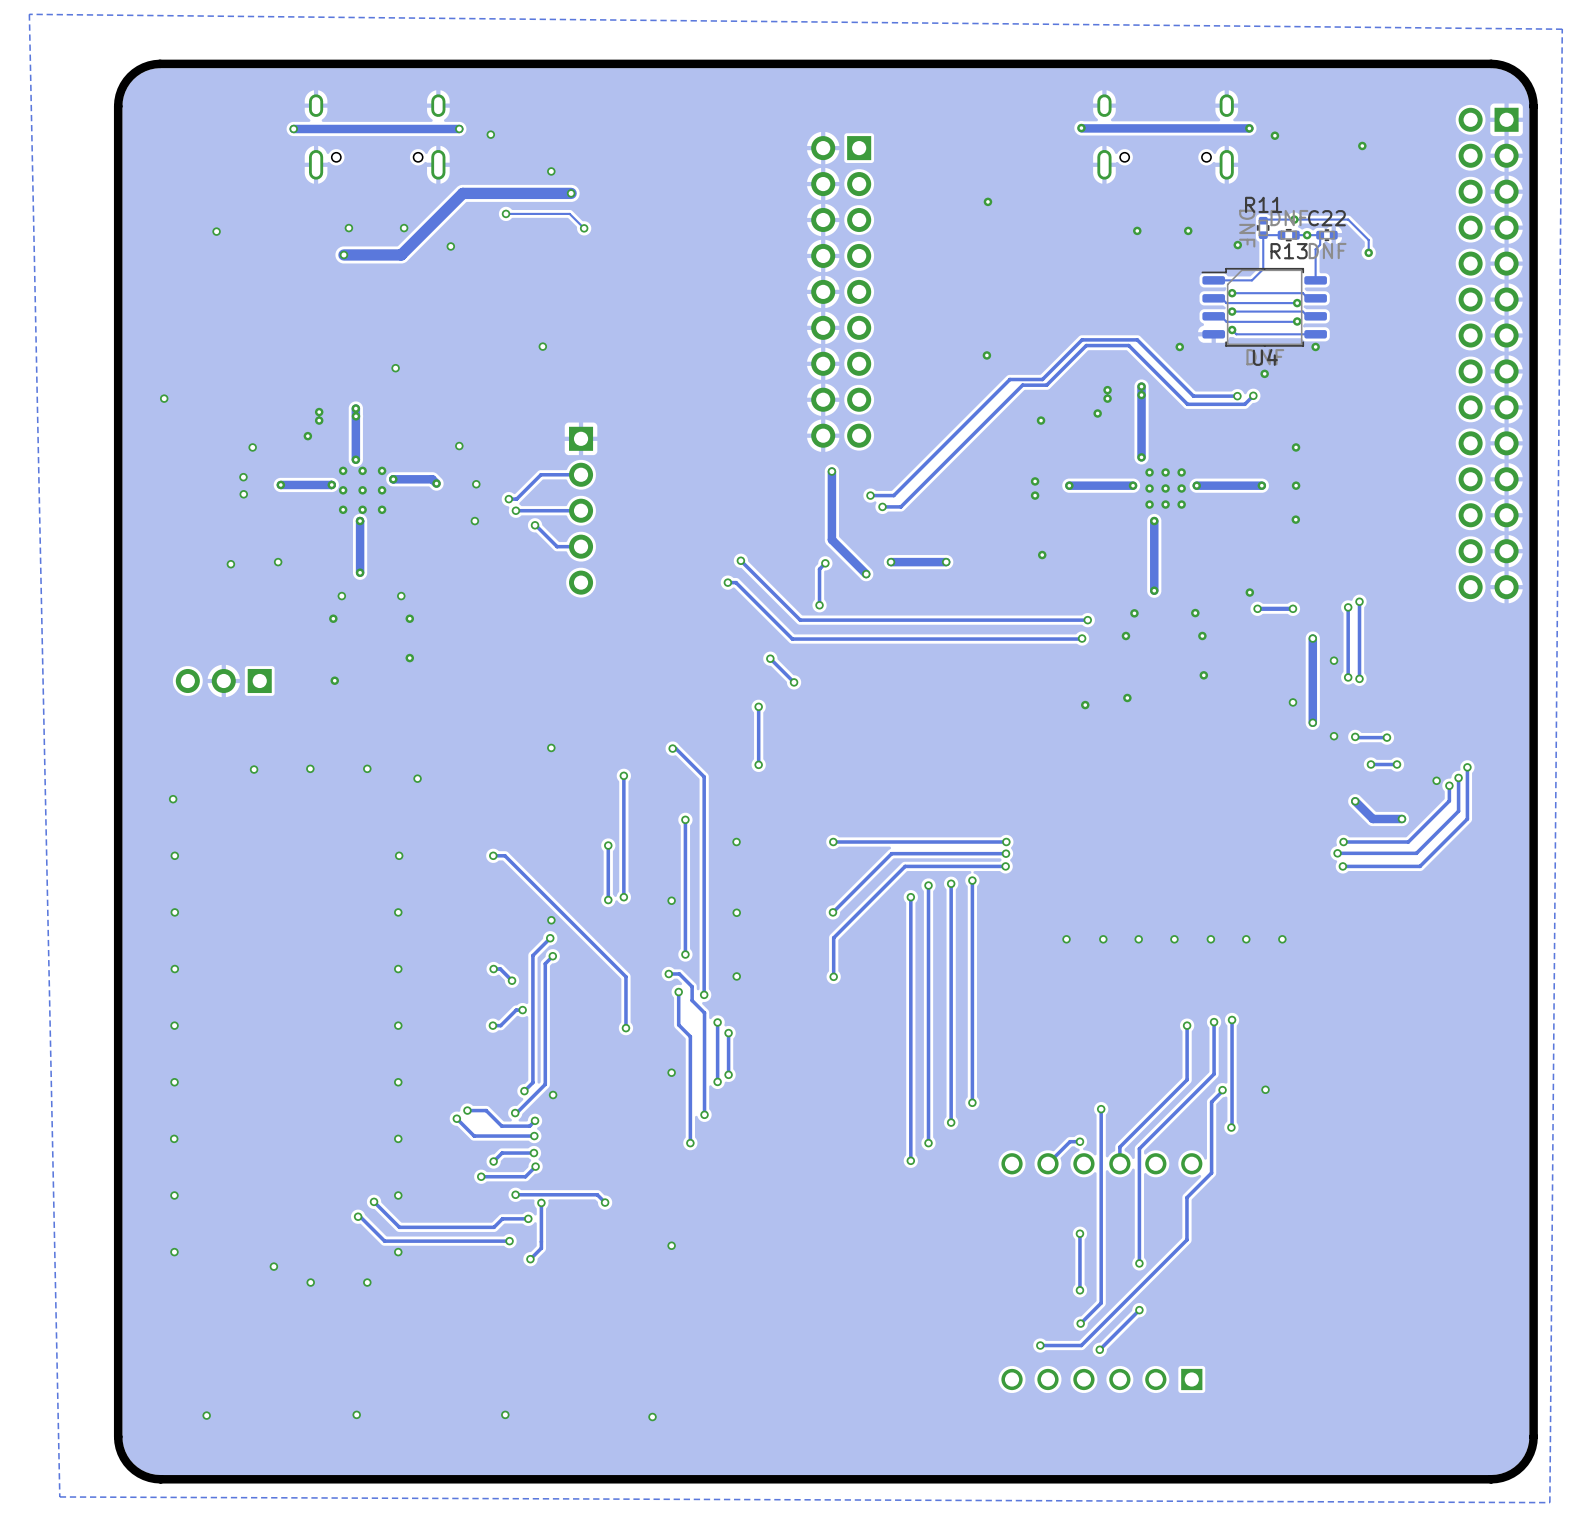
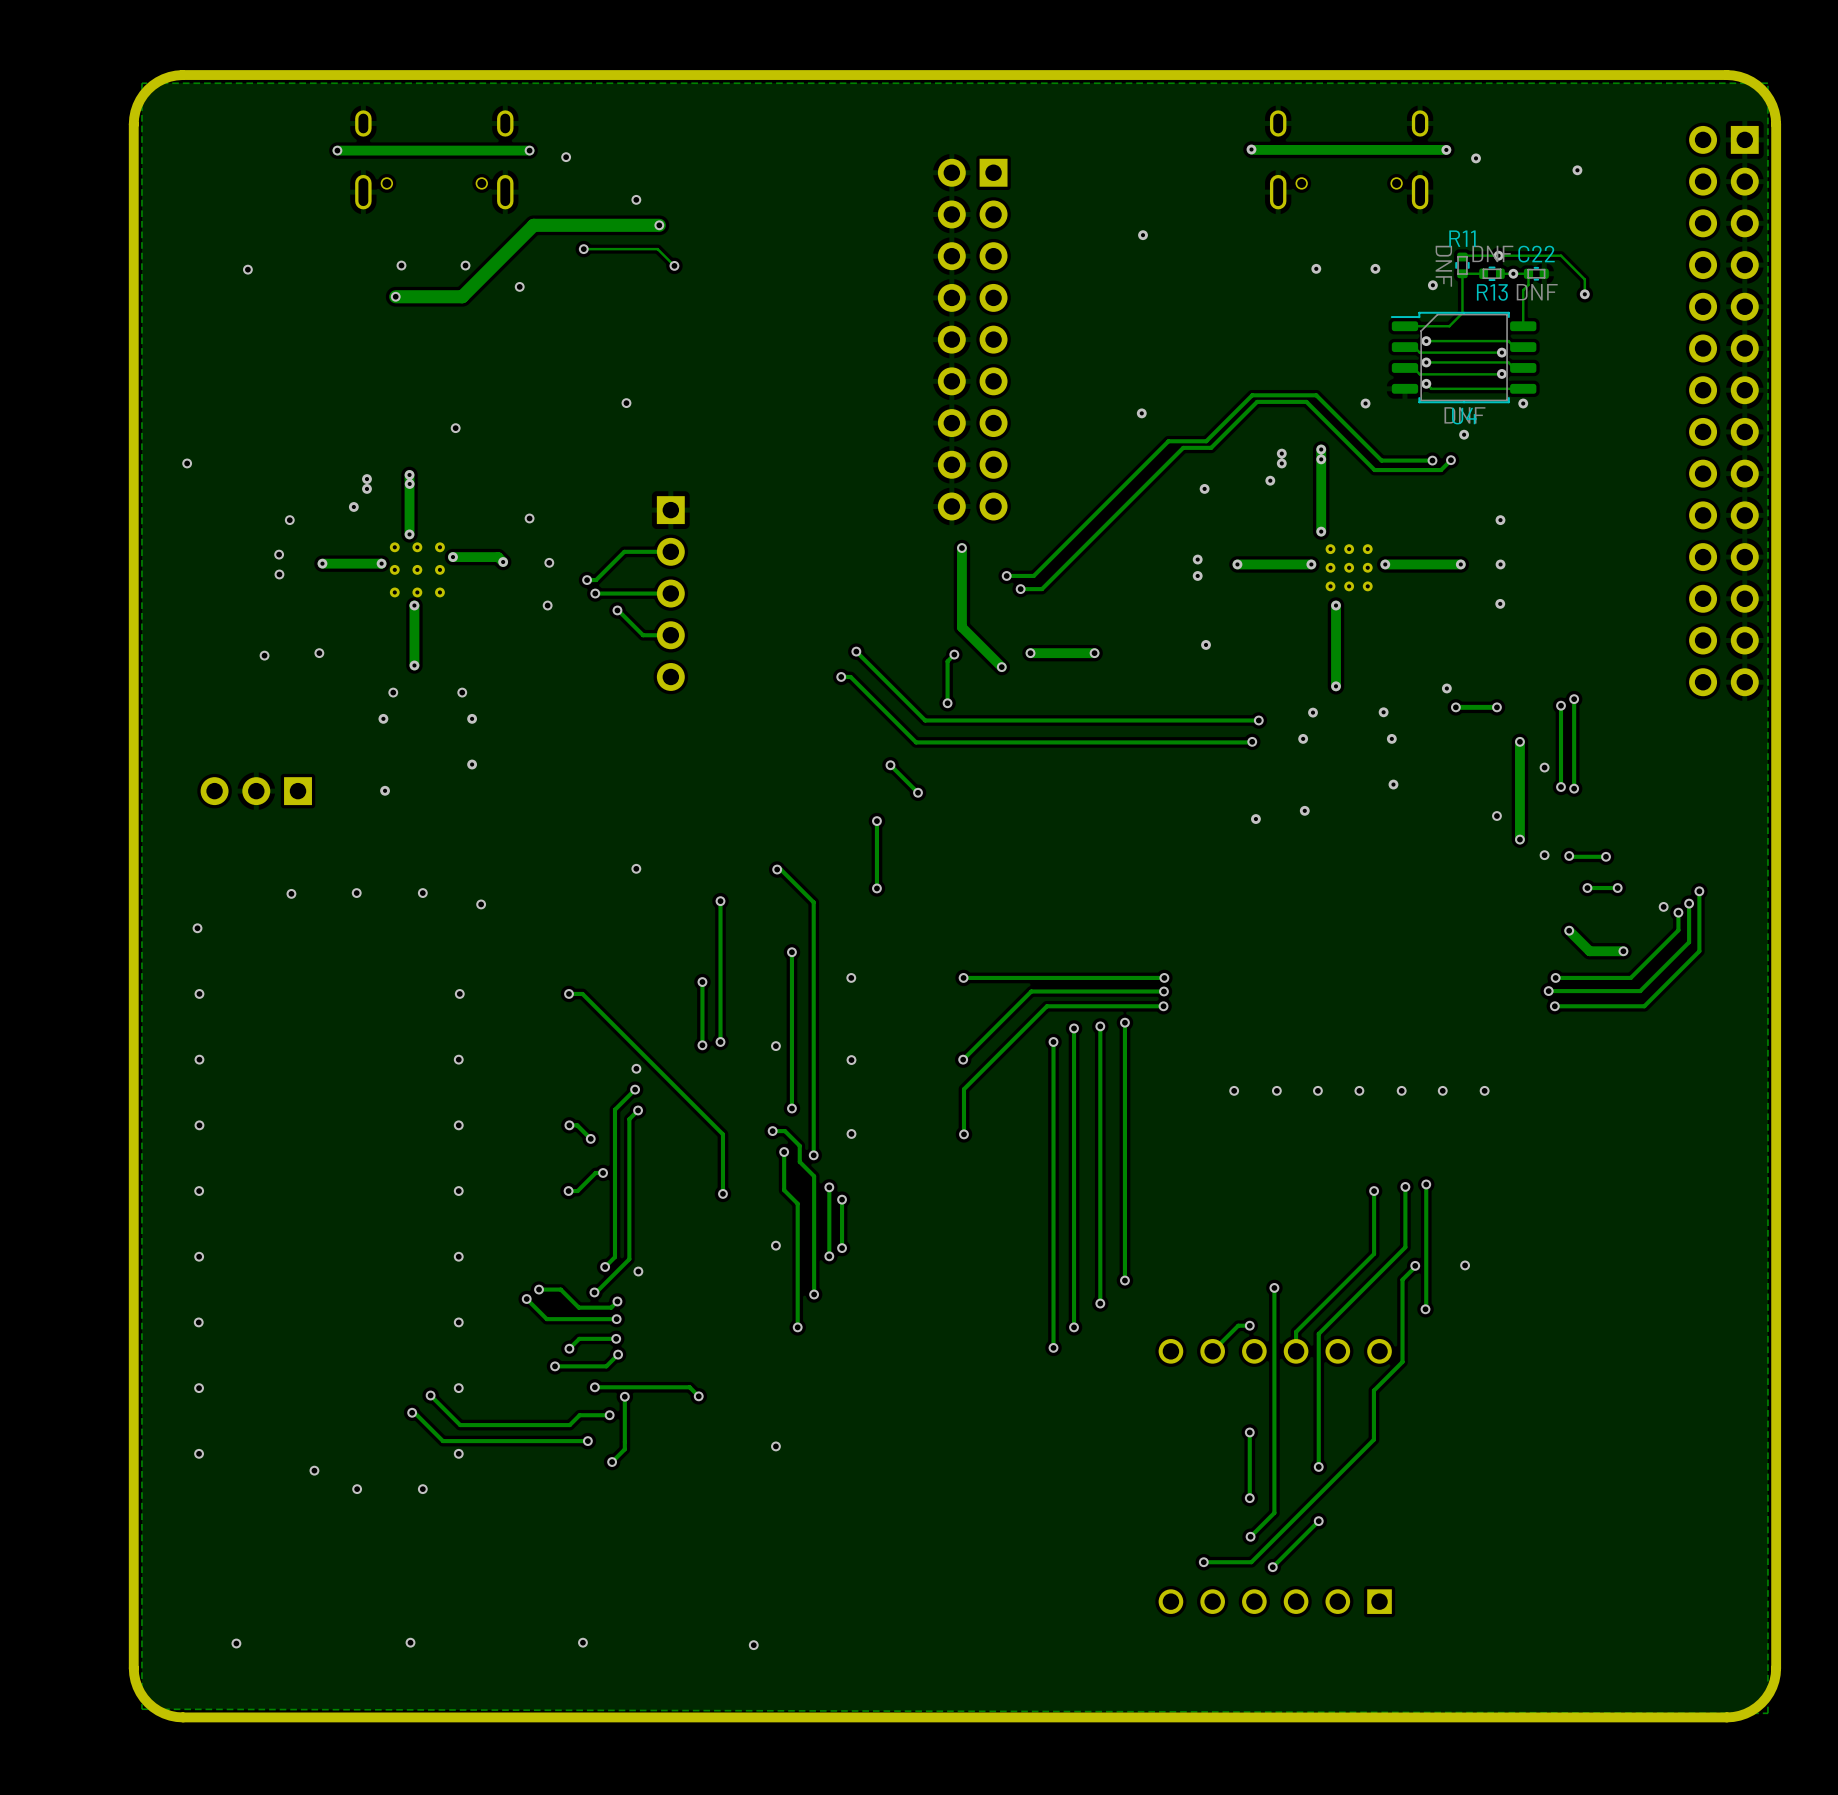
zone outline: (29, 14) (59, 1496) (1549, 1502) (1562, 29) (29, 14) -> (1767, 83) (1767, 1713) (141, 1709) (141, 83) (1767, 83)

